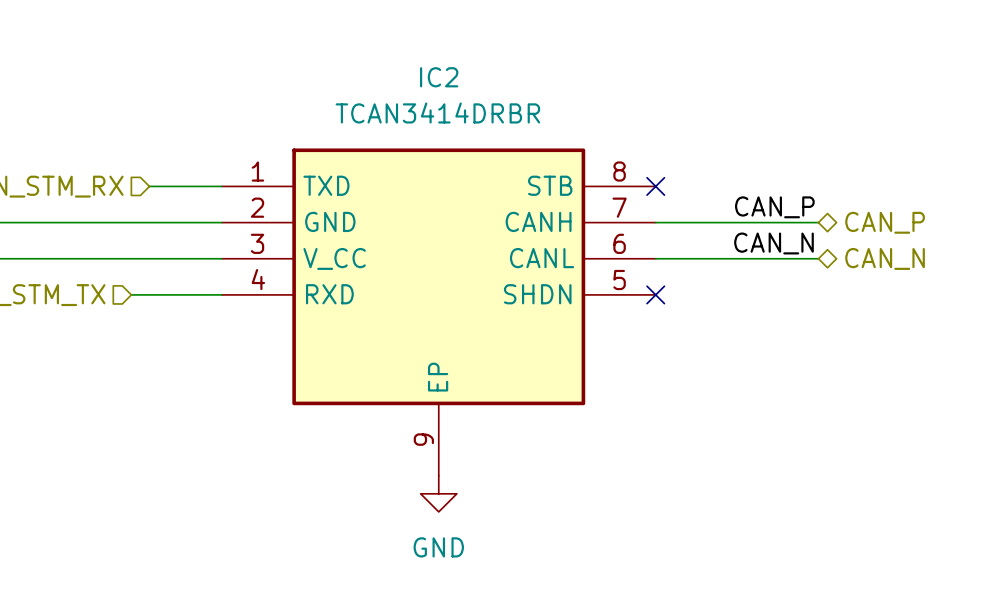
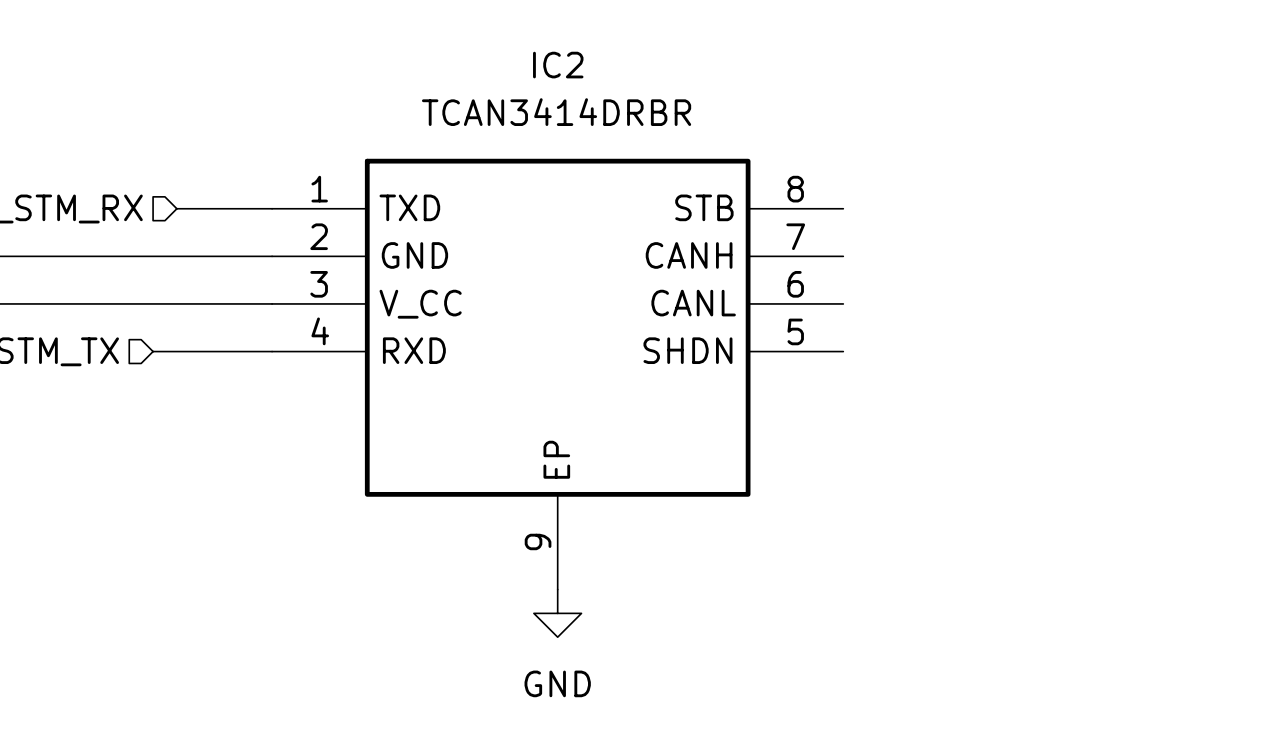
no-connect mark: (655, 186) -> none
label: CAN_P (774, 207) -> none
wire: (655, 222) (818, 222) -> none
hierarchical label: CAN_P (885, 222) -> none
label: CAN_N (774, 243) -> none
wire: (655, 258) (818, 258) -> none
hierarchical label: CAN_N (885, 258) -> none
no-connect mark: (655, 294) -> none

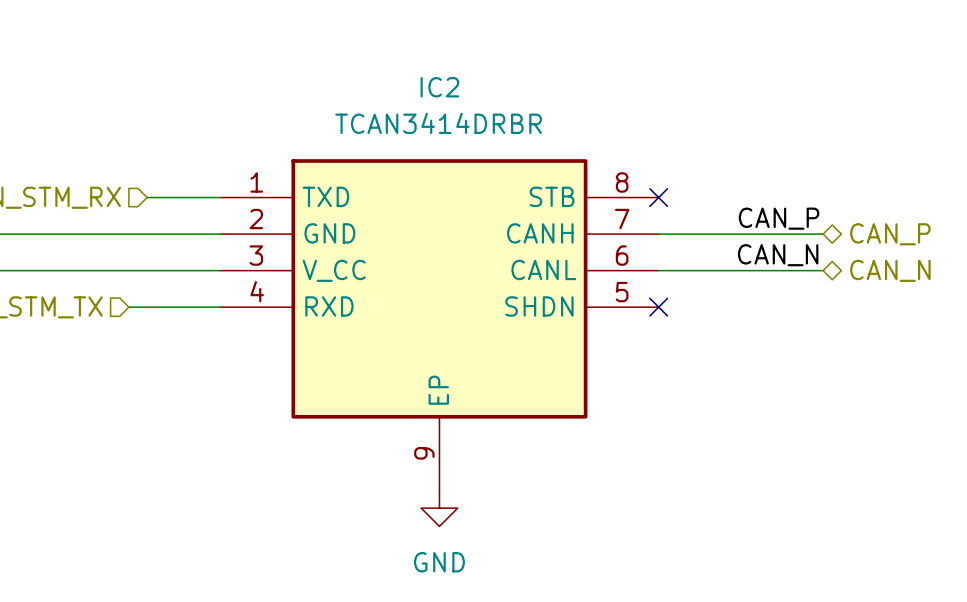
no-connect mark: none -> (658, 197)
label: none -> CAN_P (779, 218)
wire: none -> (658, 234) (823, 234)
hierarchical label: none -> CAN_P (890, 234)
label: none -> CAN_N (778, 255)
wire: none -> (658, 270) (823, 270)
hierarchical label: none -> CAN_N (890, 270)
no-connect mark: none -> (658, 307)

